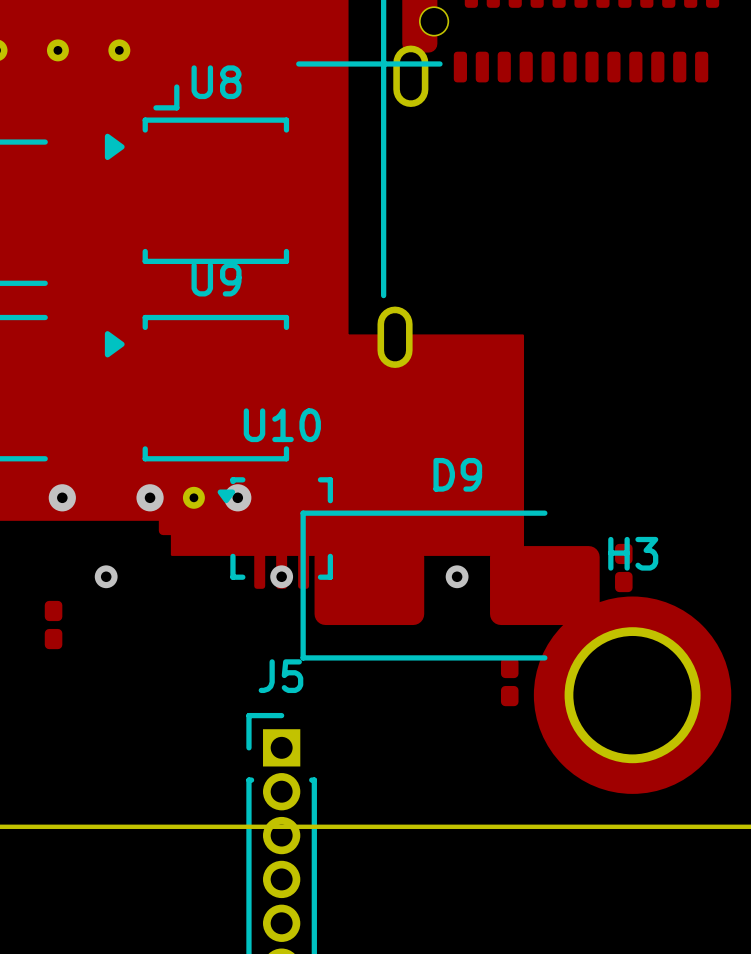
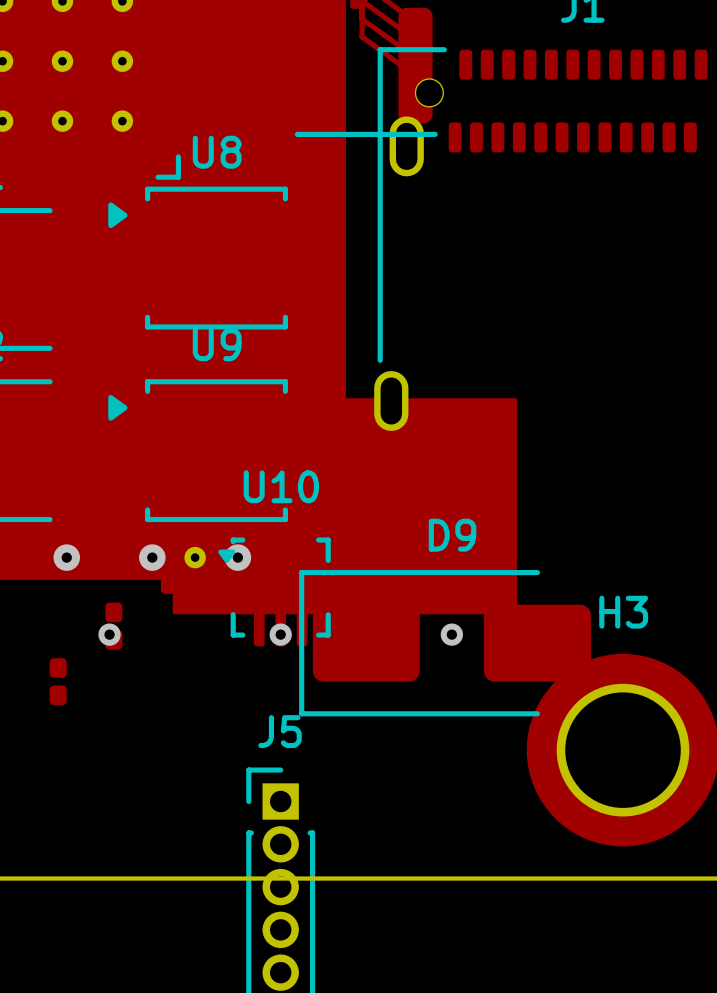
part: none -> (113, 626)
part: (623, 567) -> none
part: (509, 682) -> none

